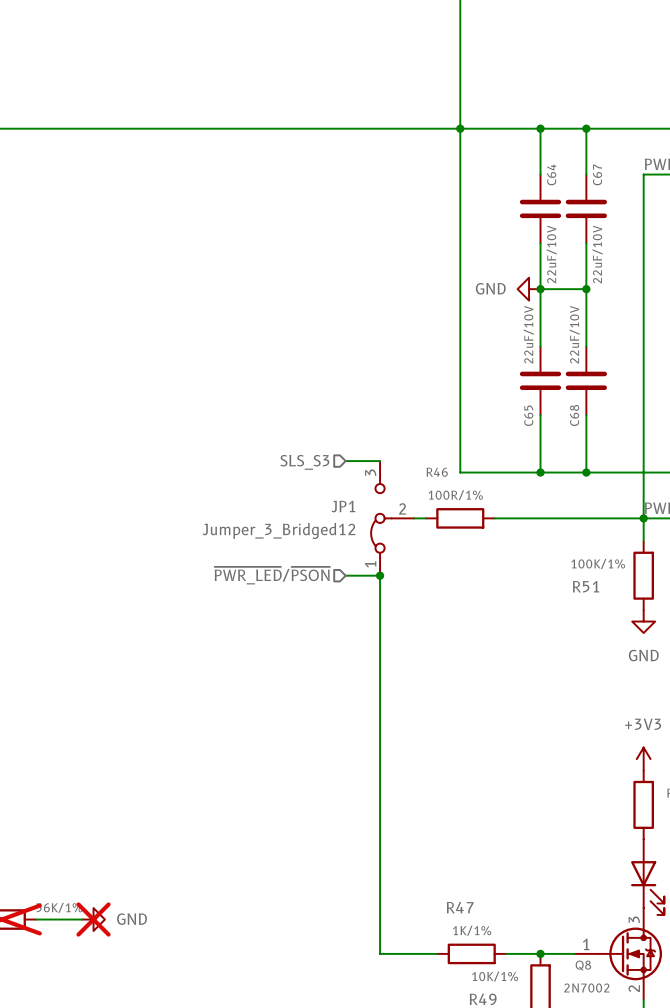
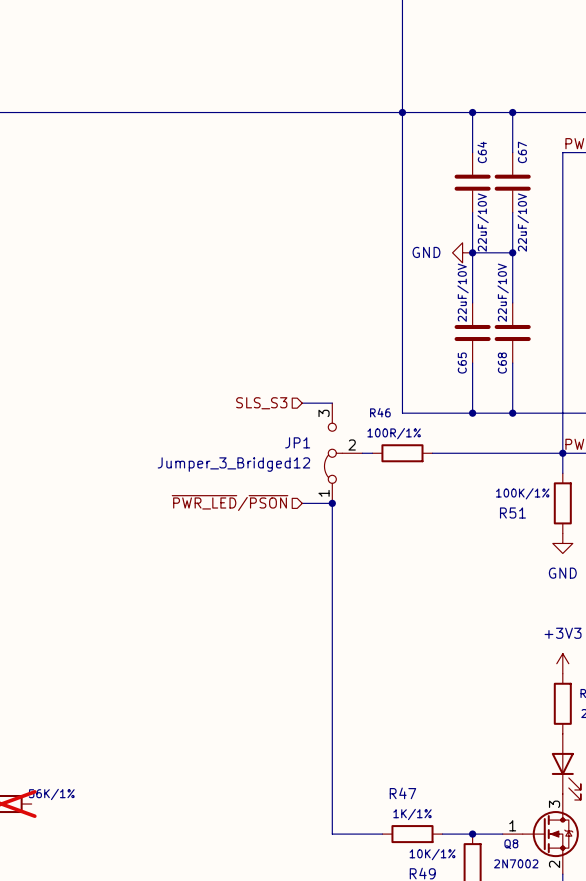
wire: (36, 919) (82, 919) -> none
power symbol: GND (93, 919) -> none

